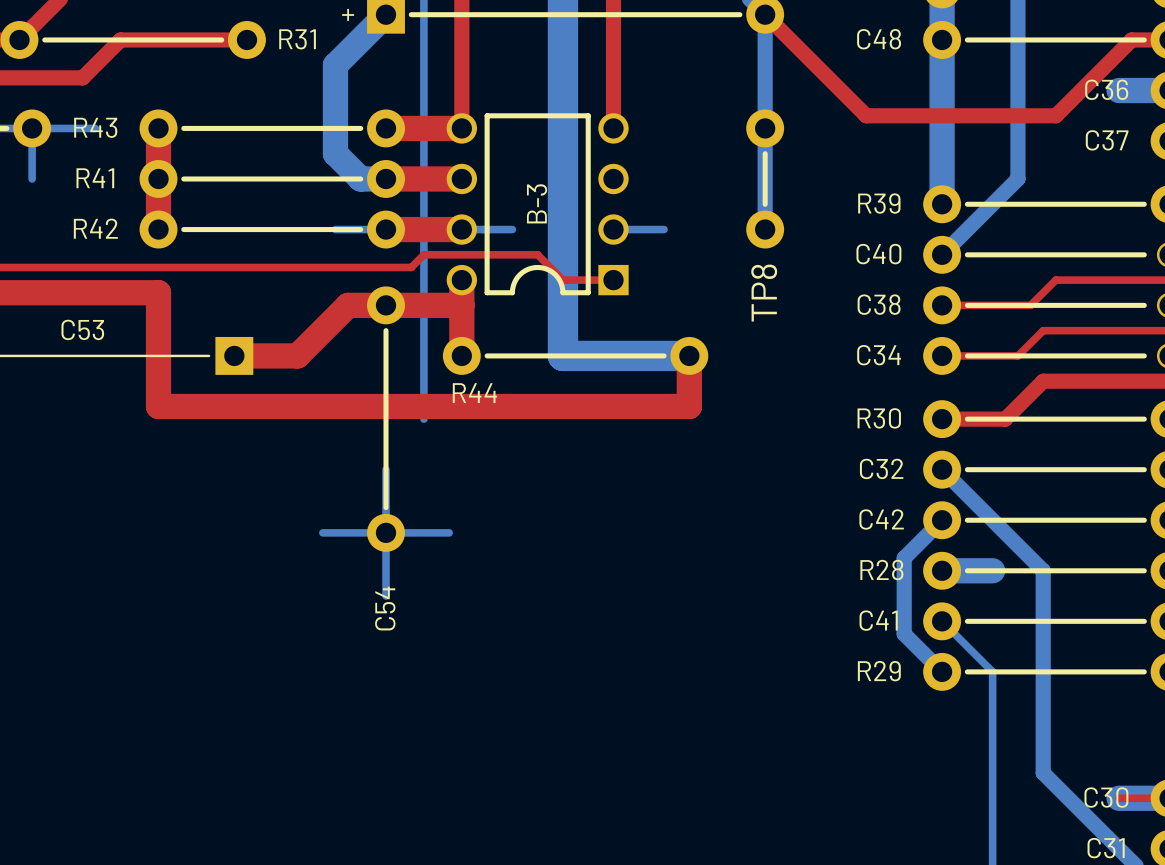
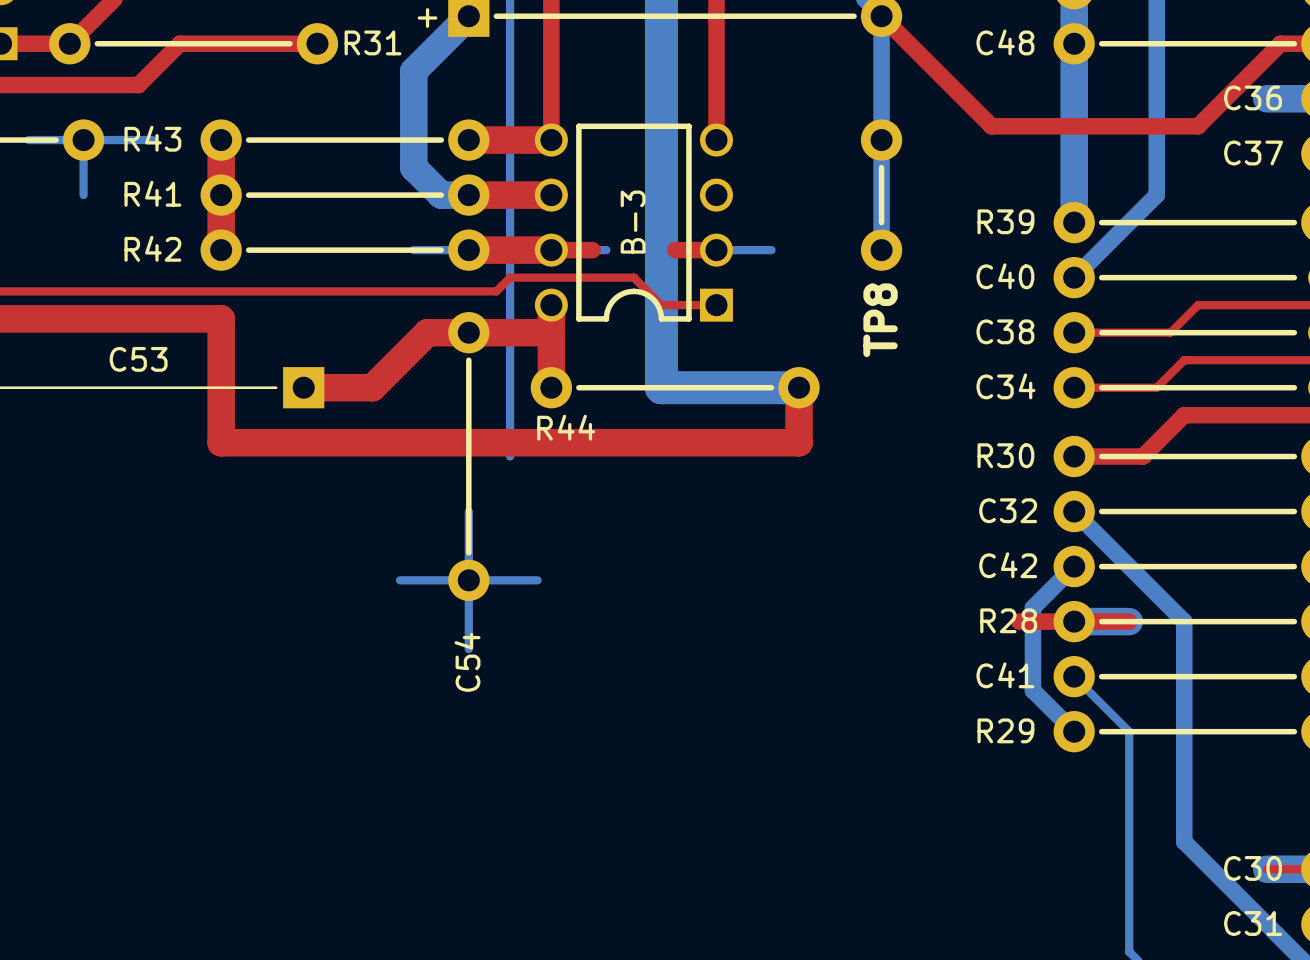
top track: none -> (551, 250) (592, 250)
top track: none -> (675, 250) (716, 250)
top track: none -> (1019, 621) (1129, 621)

